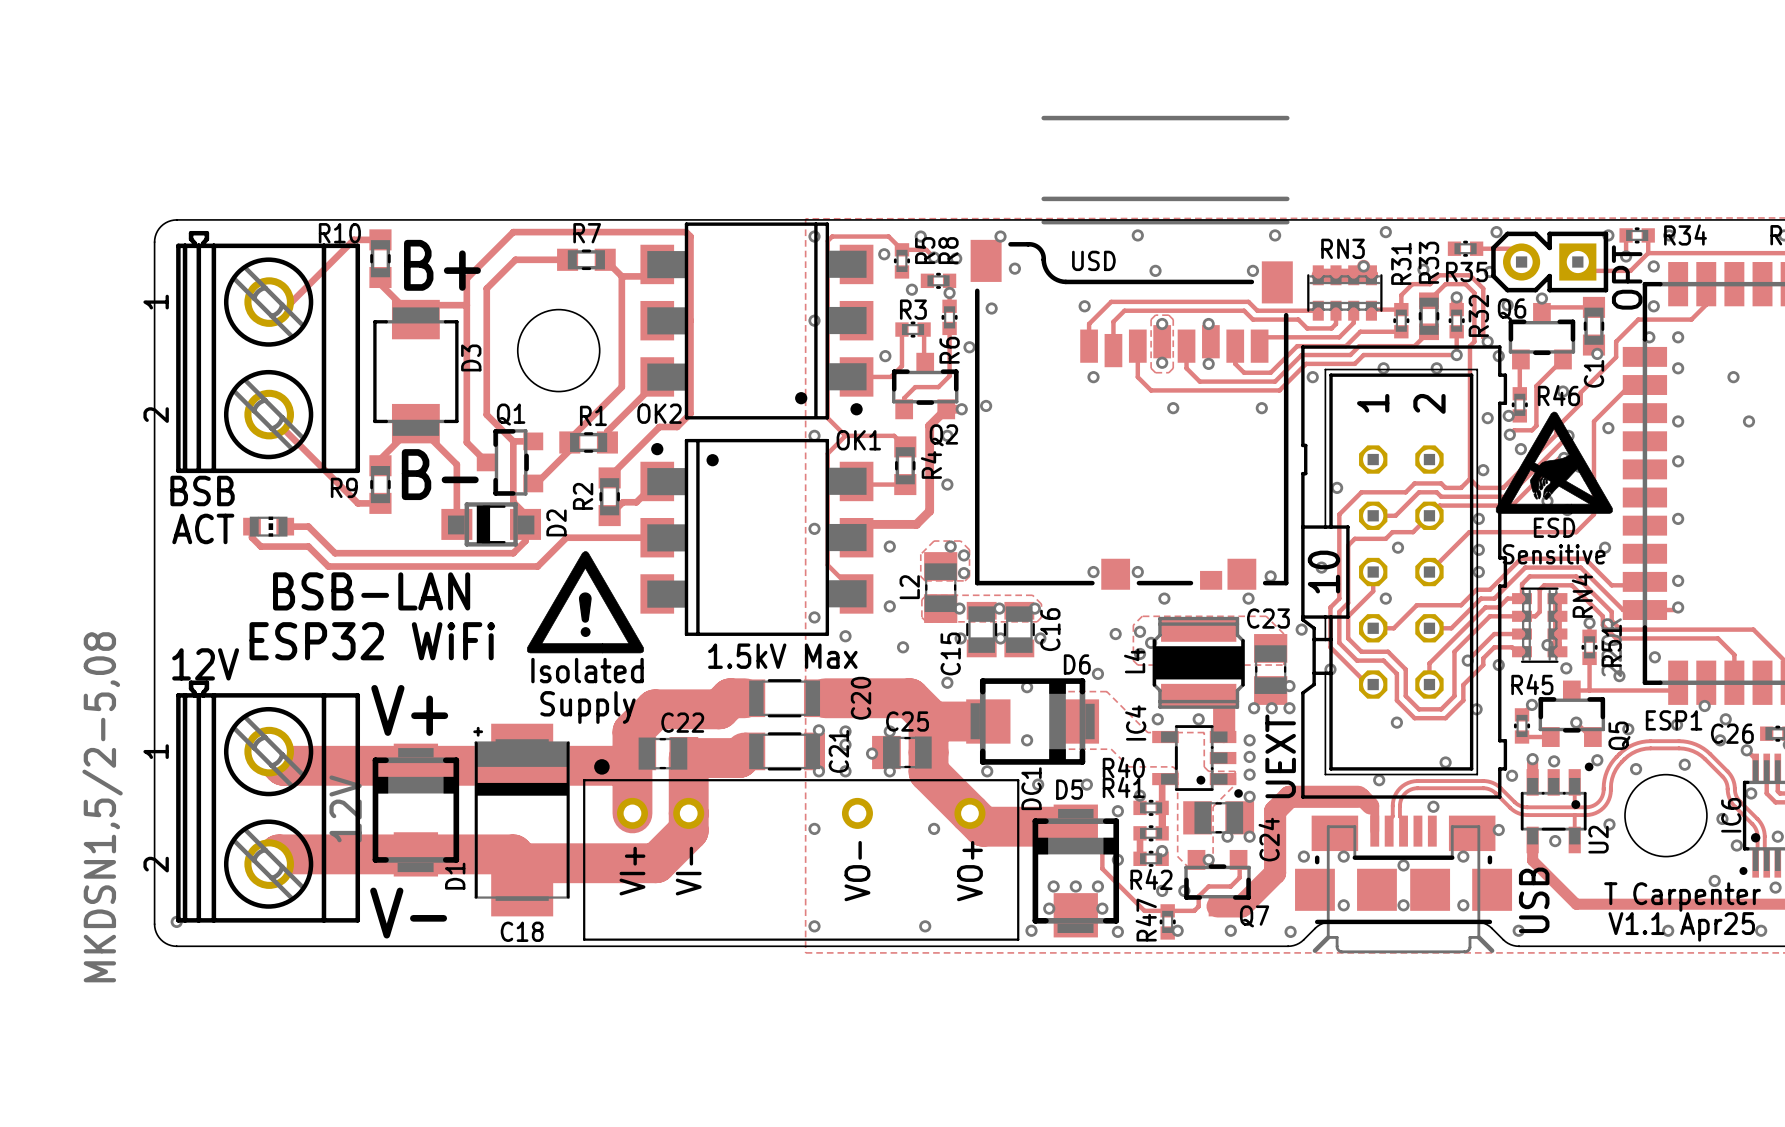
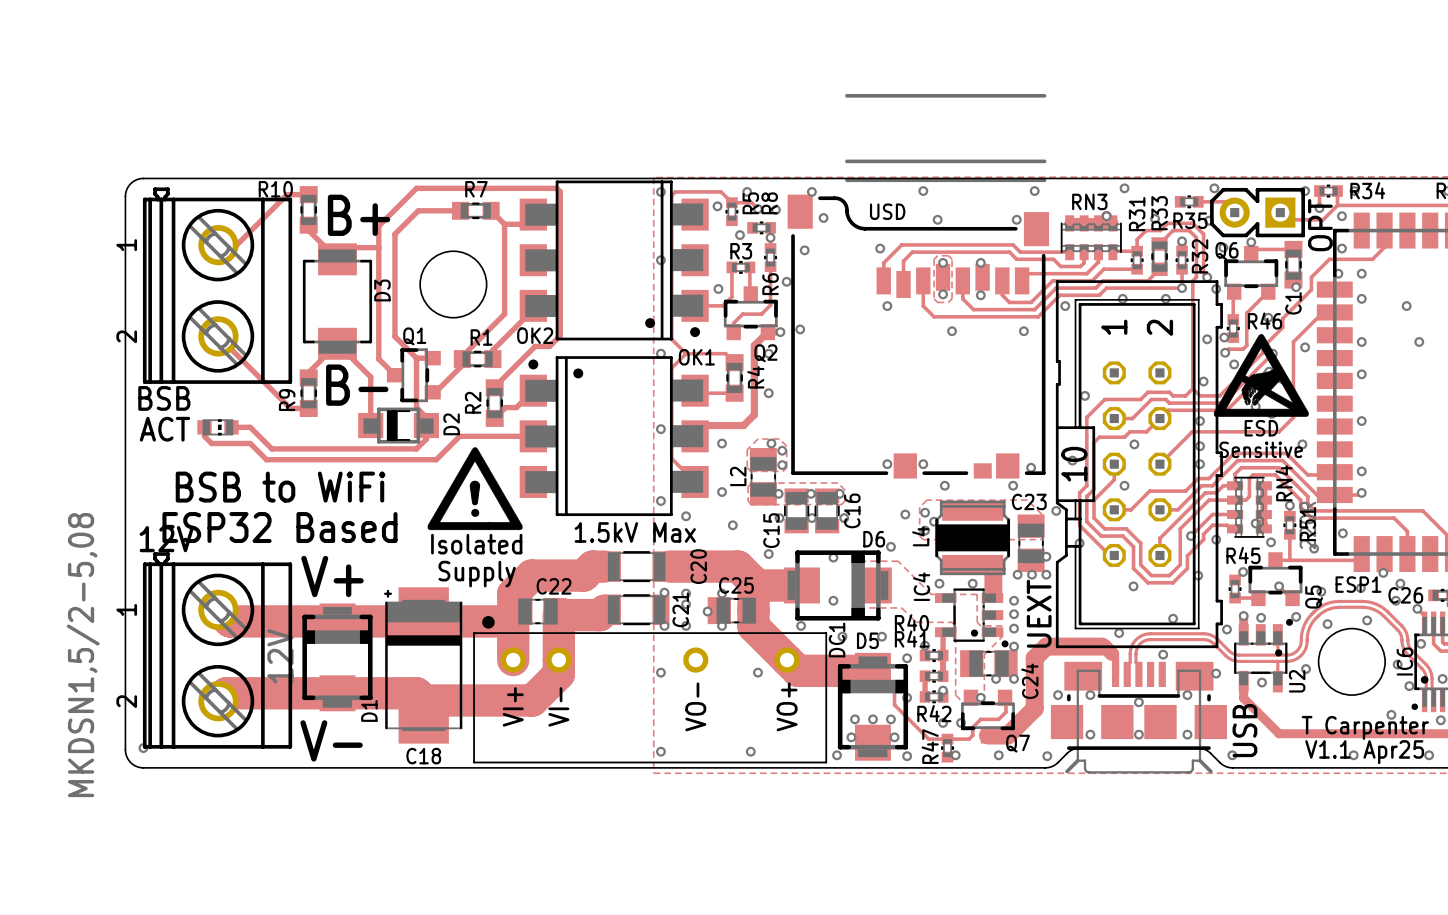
R9 name rotation: 0° (344, 487) -> 90° counterclockwise (287, 400)
text: BSB-LAN (371, 591) -> none
text: none -> BSB to WiFi (280, 487)
text: ESP32 WiFi (372, 641) -> none
text: none -> ESP32 Based (279, 527)

